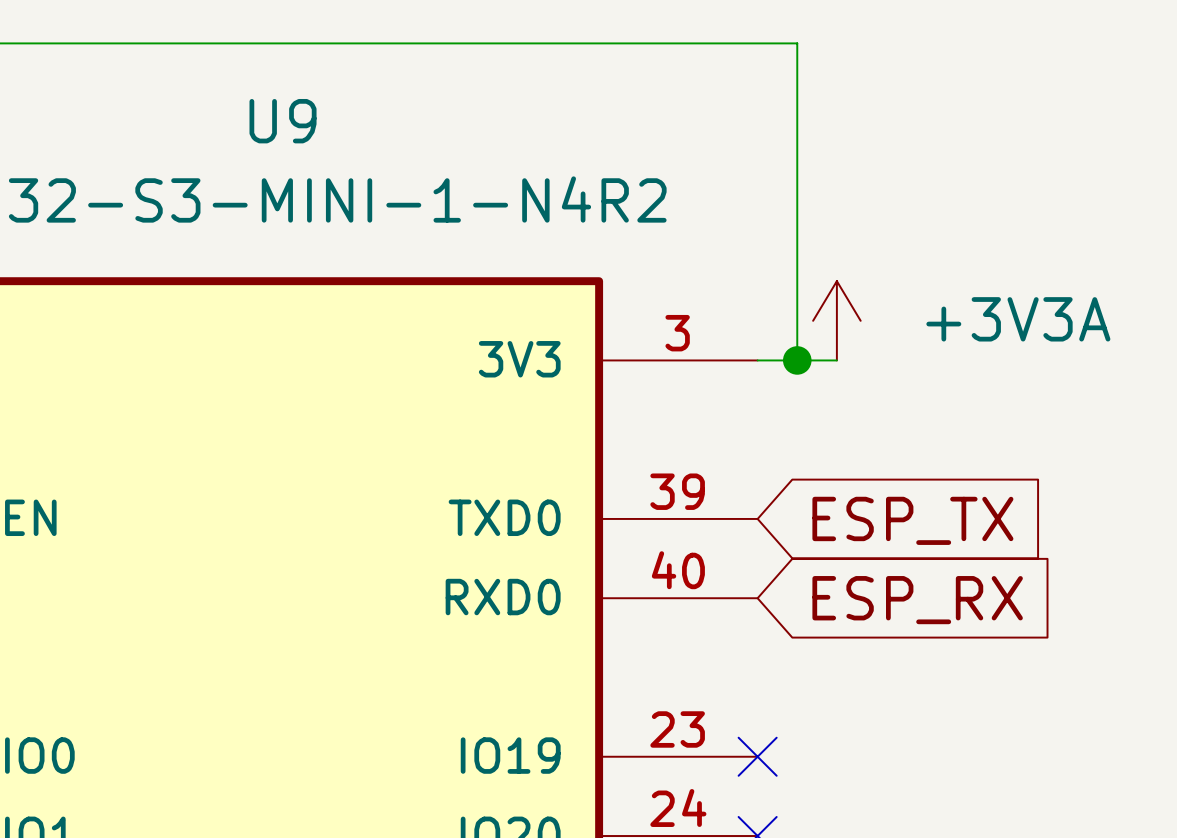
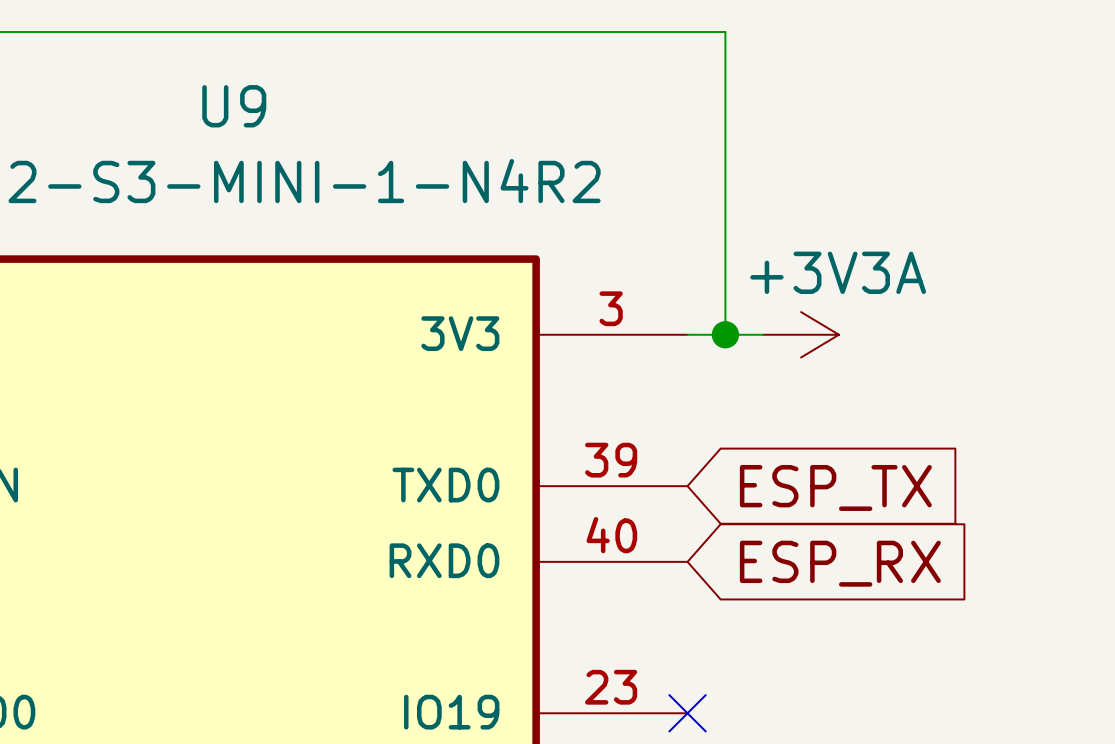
power symbol text position: +3V3A (1018, 319) -> +3V3A (838, 272)
power symbol rotation: 0° (836, 320) -> 90° clockwise (801, 334)
power symbol position: +3V3A (836, 320) -> +3V3A (801, 334)

